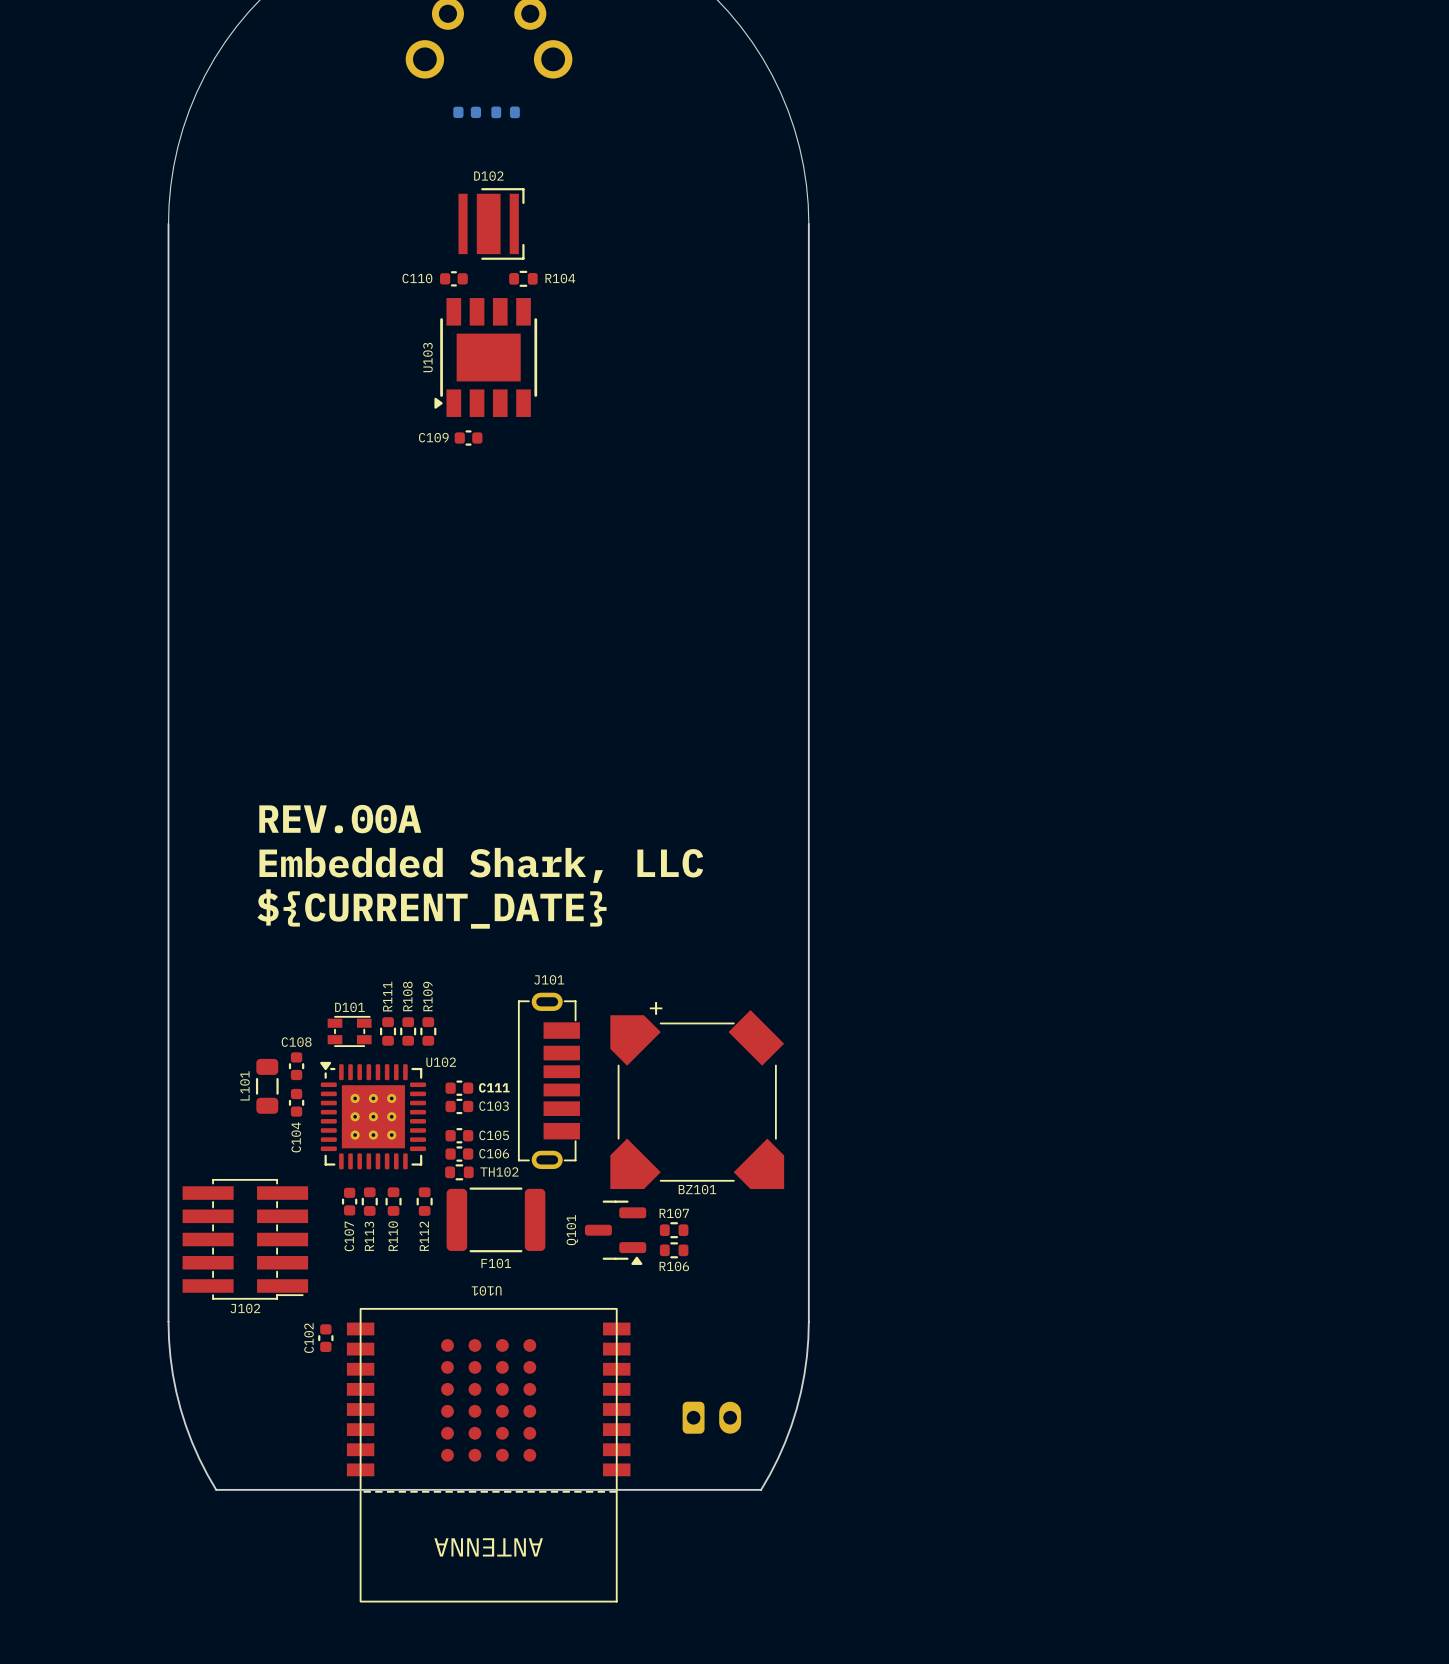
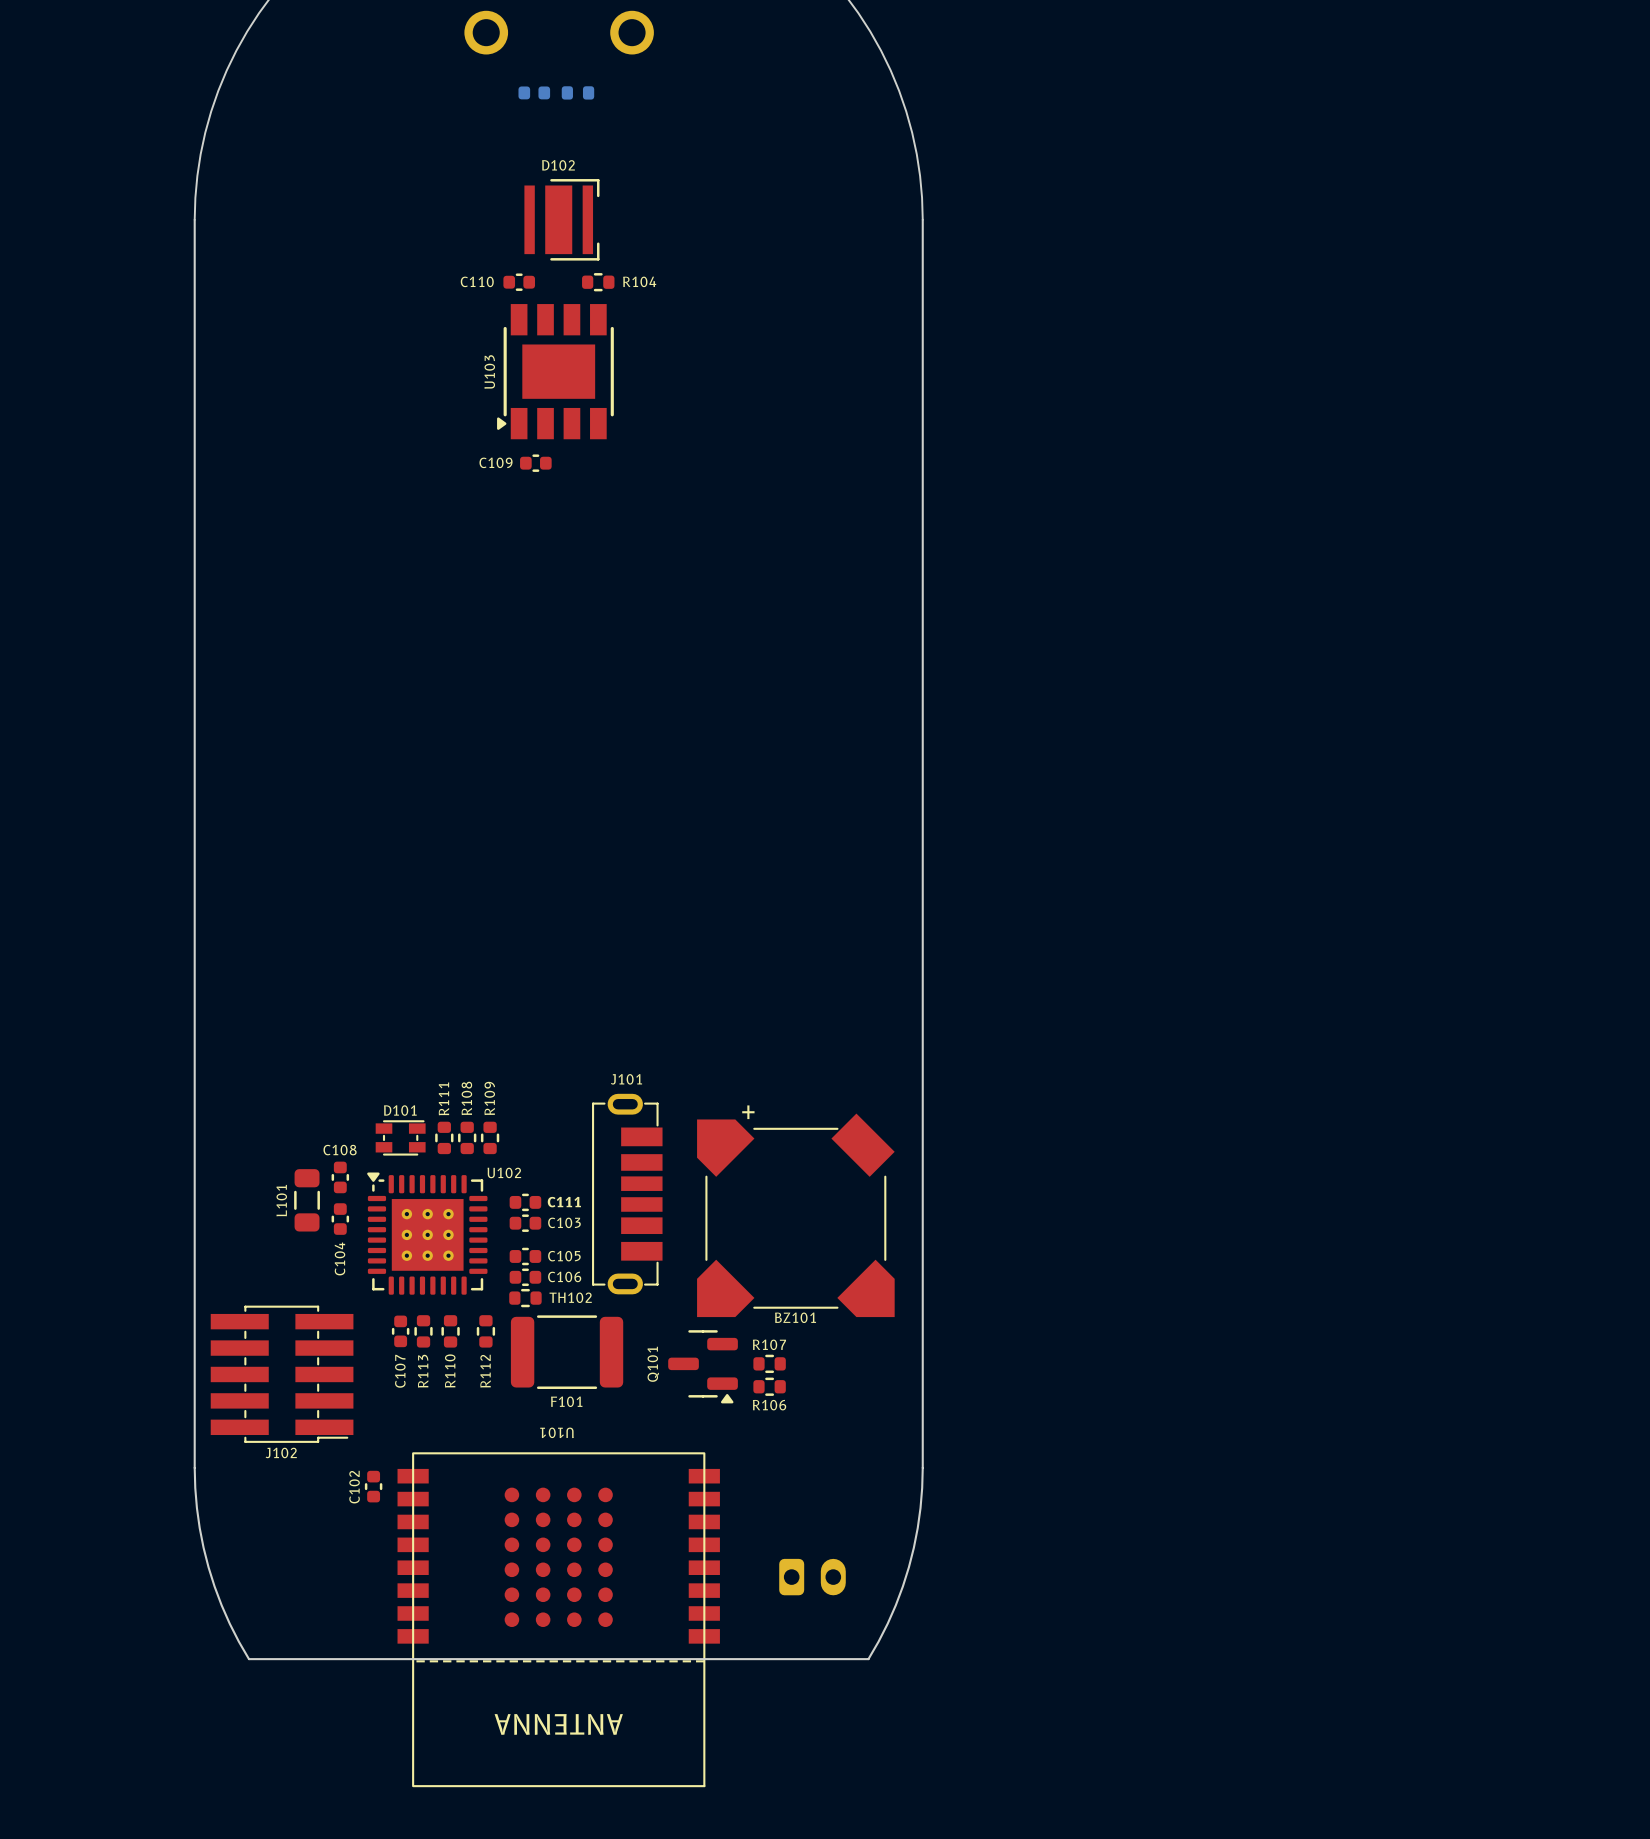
text: REV.00A (340, 819) -> none
text: Embedded Shark, LLC (481, 865) -> none
text: ${CURRENT_DATE} (432, 909) -> none

